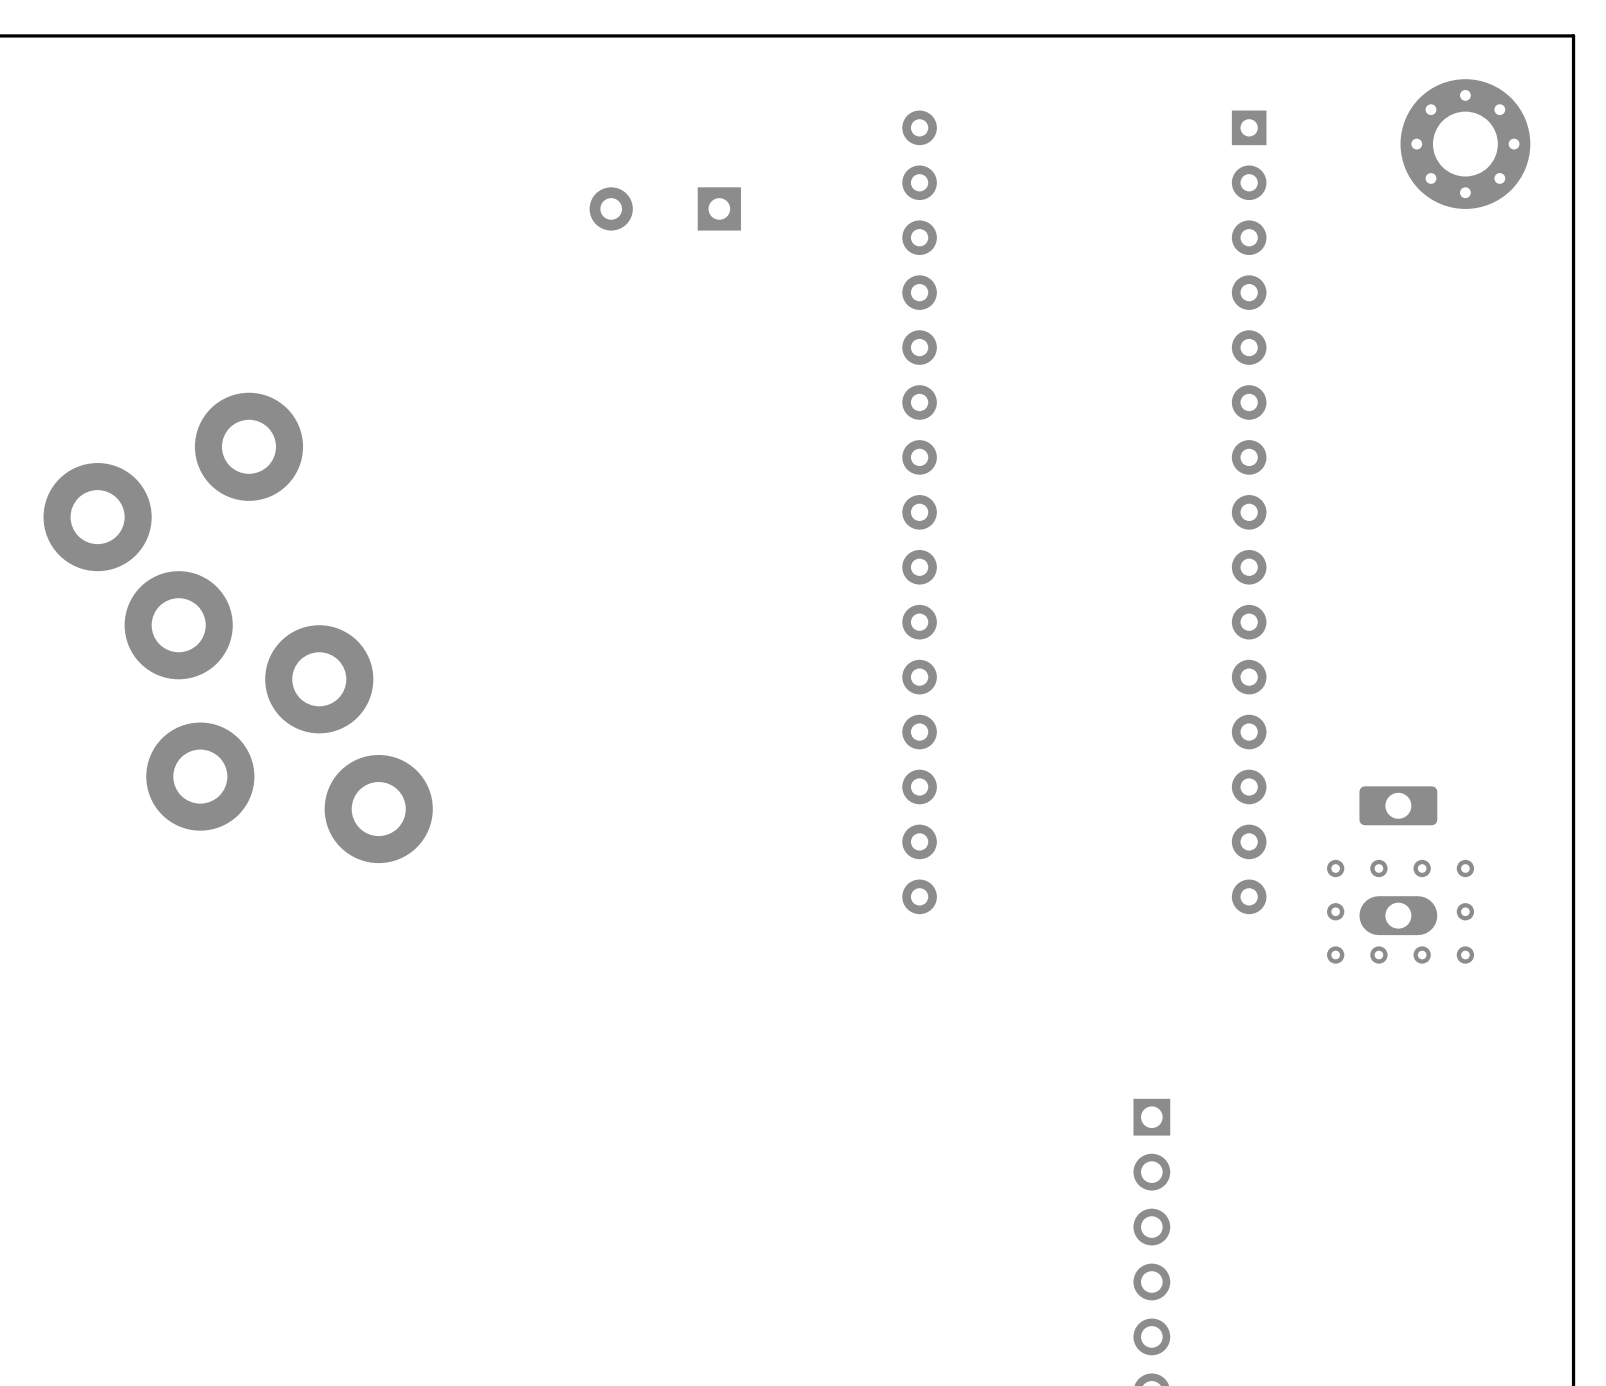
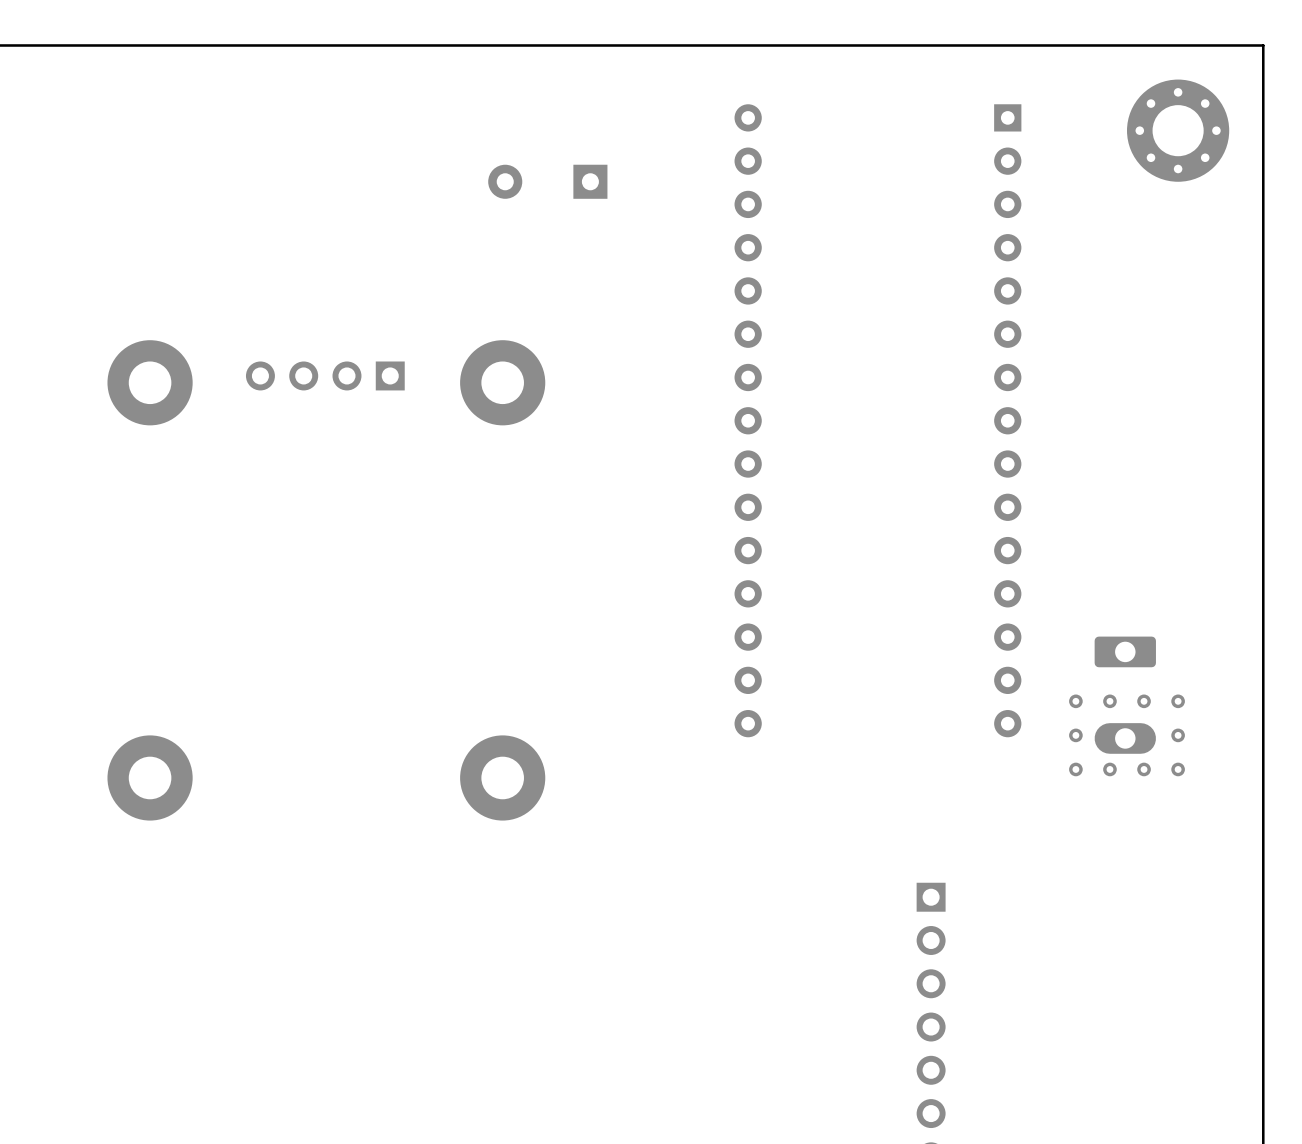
part: (248, 446) -> none
part: none -> (325, 375)
part: none -> (150, 382)
part: none -> (502, 382)
part: (97, 517) -> none
part: (178, 625) -> none
part: (319, 679) -> none
part: (200, 776) -> none
part: (378, 809) -> none
part: none -> (150, 777)
part: none -> (502, 777)

